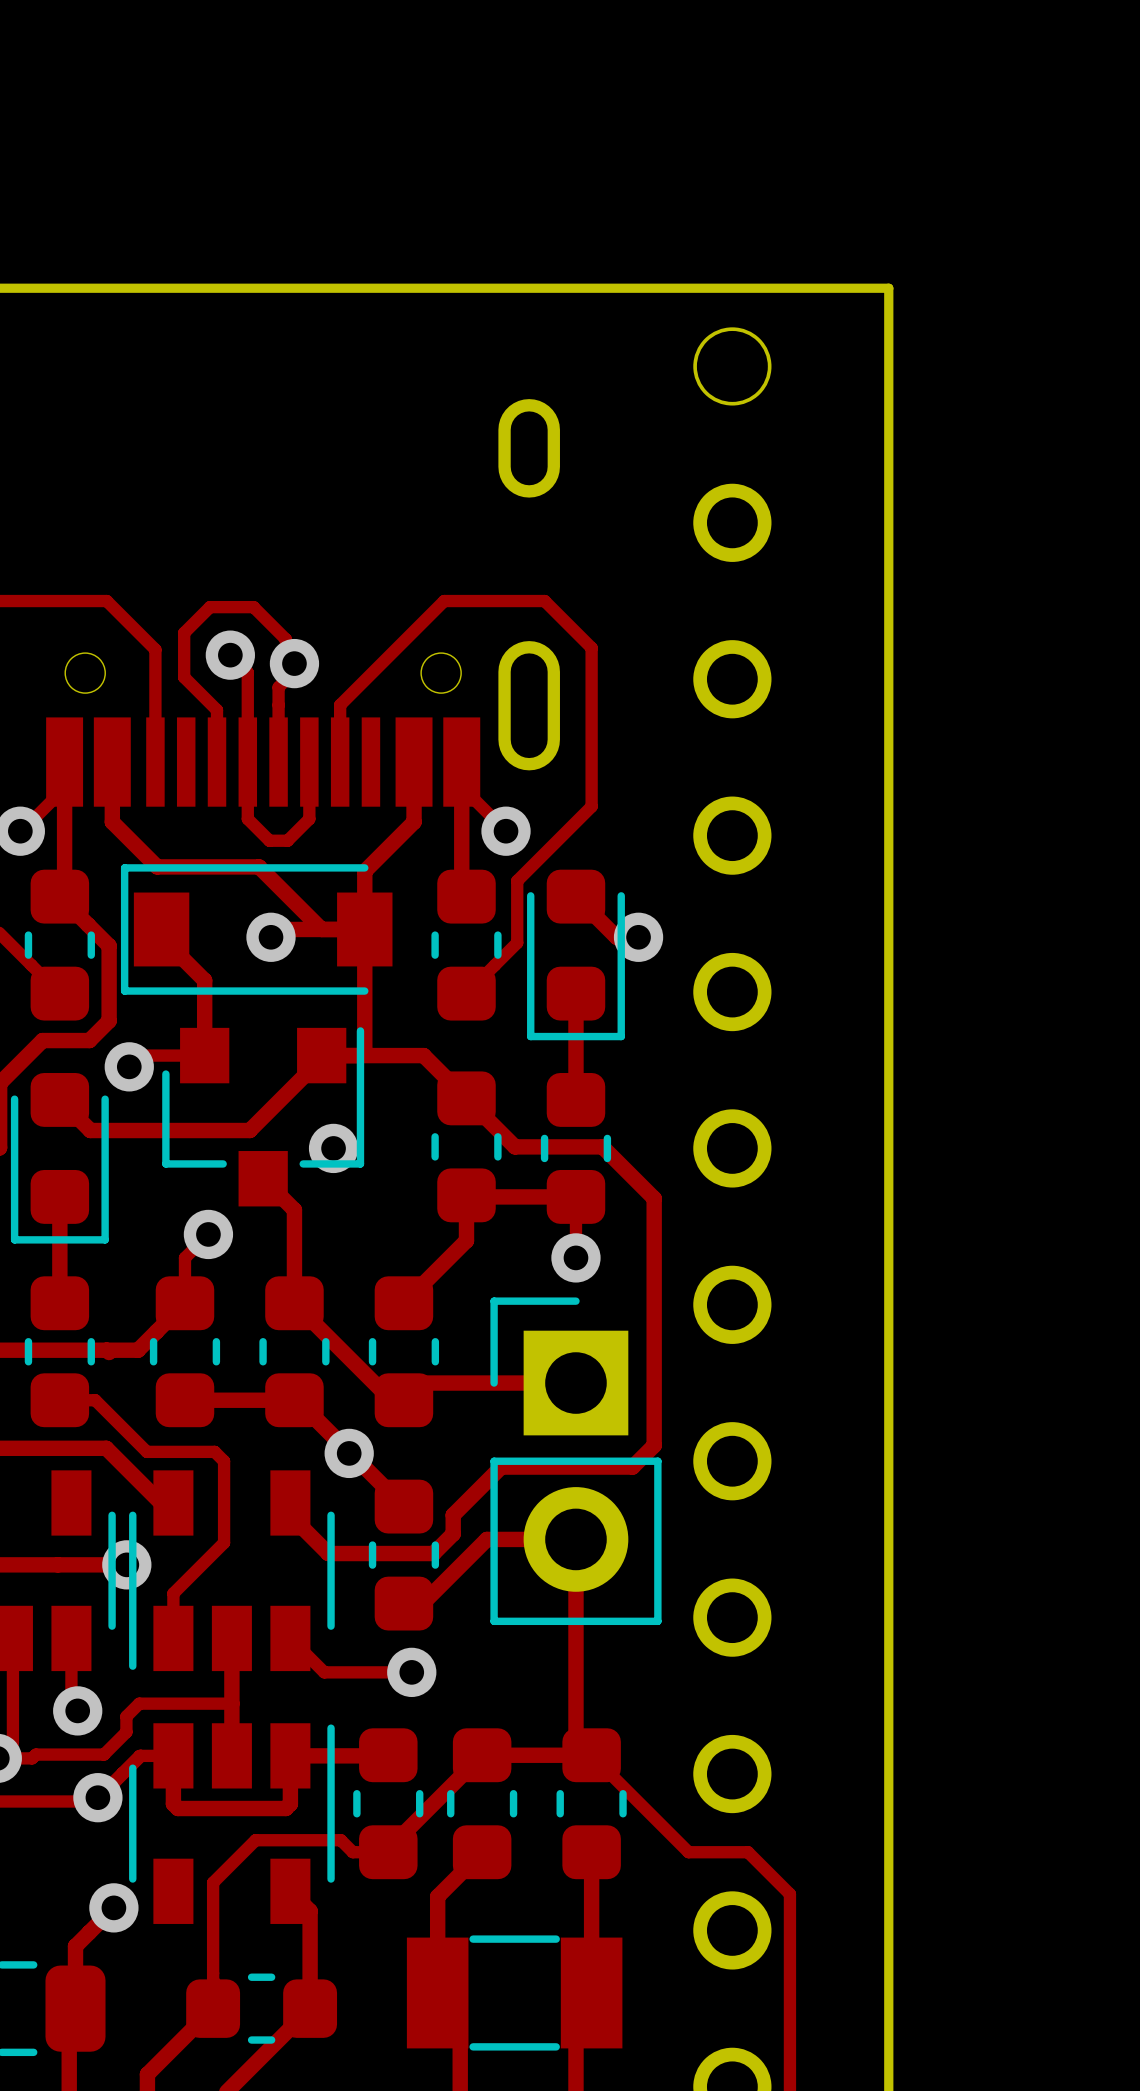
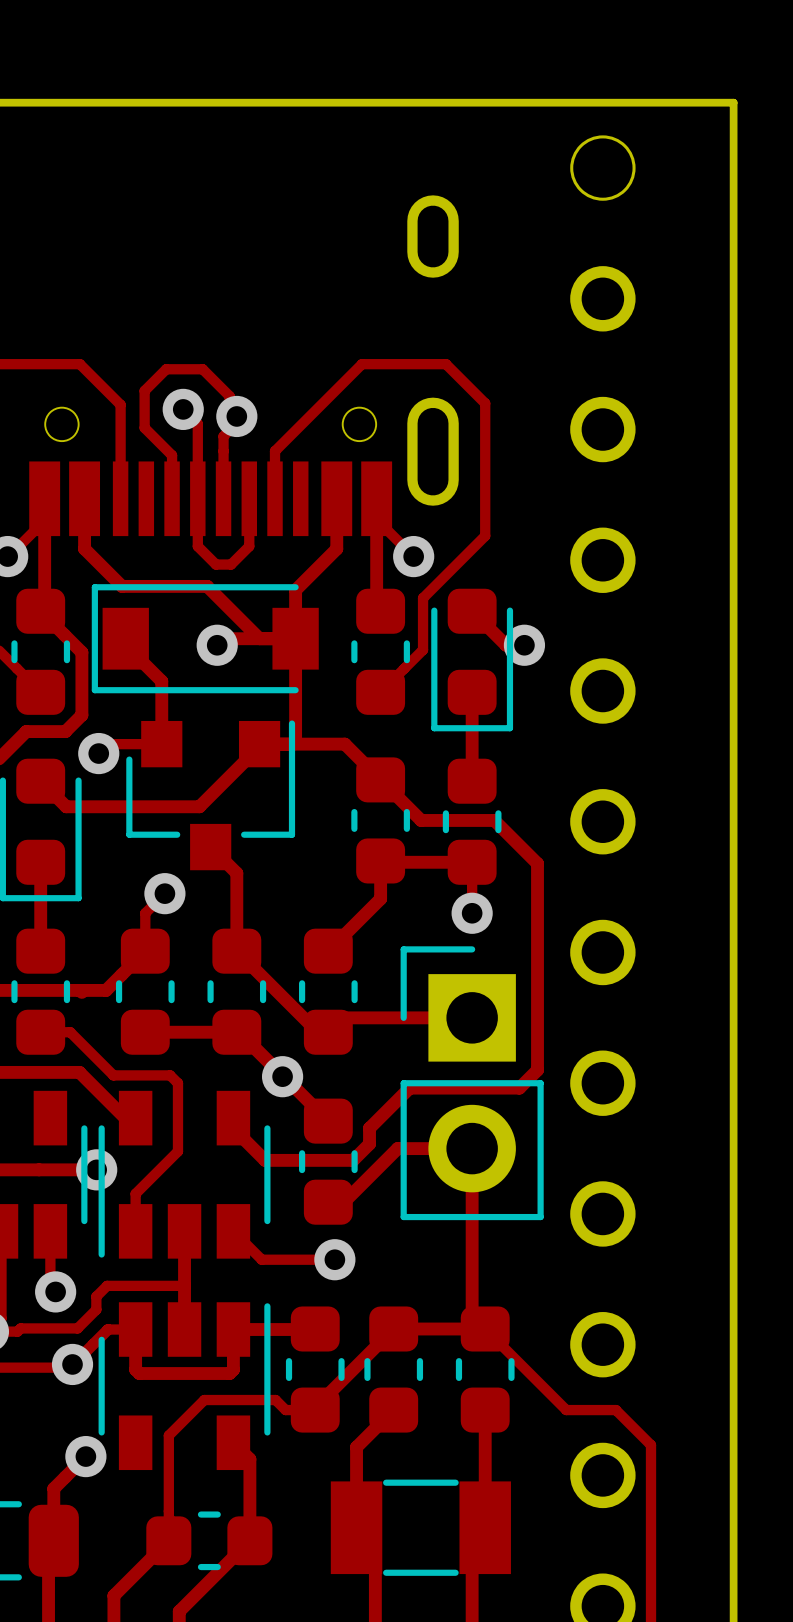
via: (333, 1148) -> none

